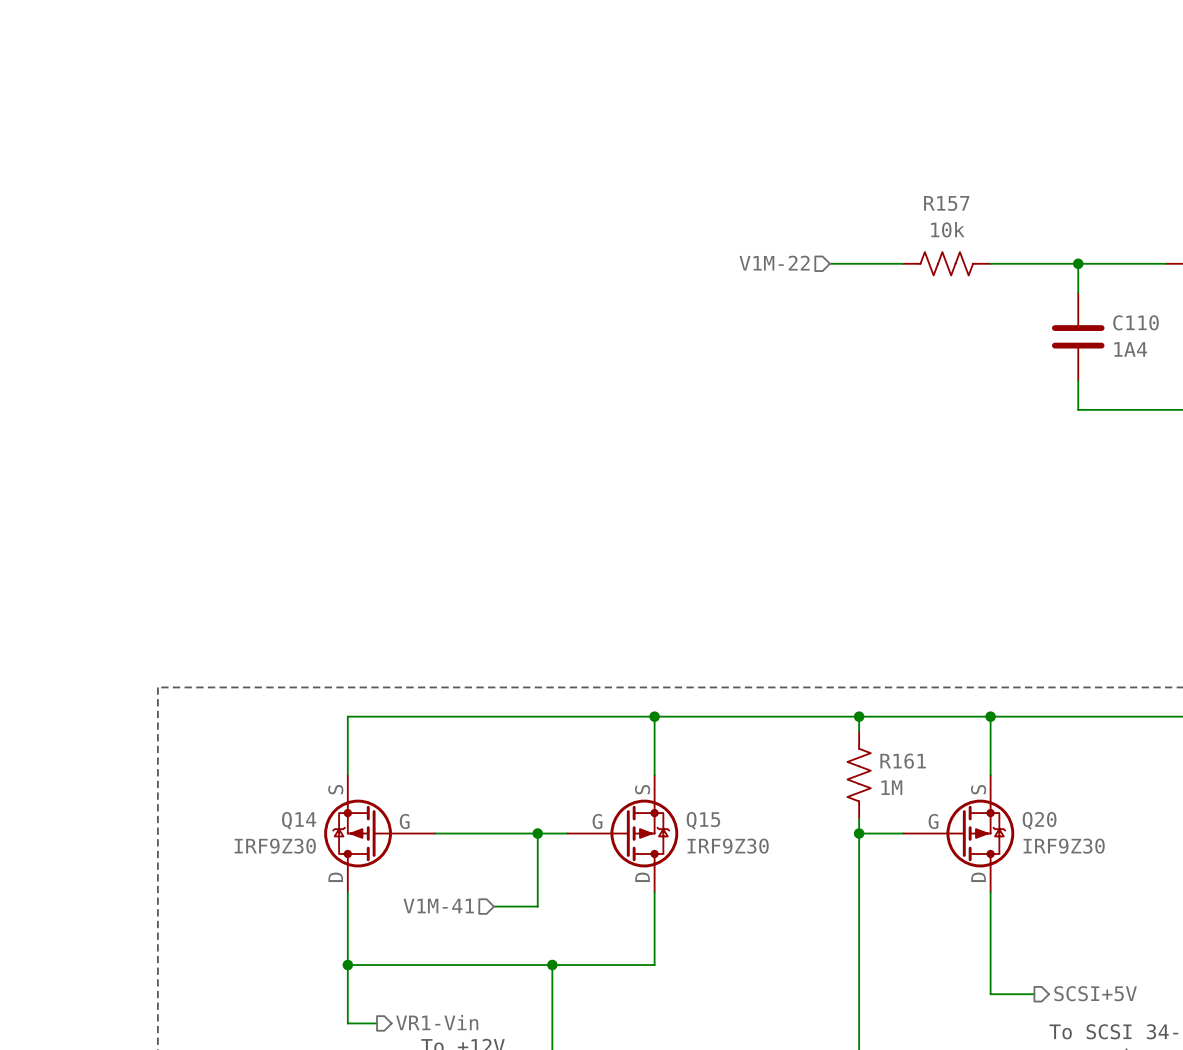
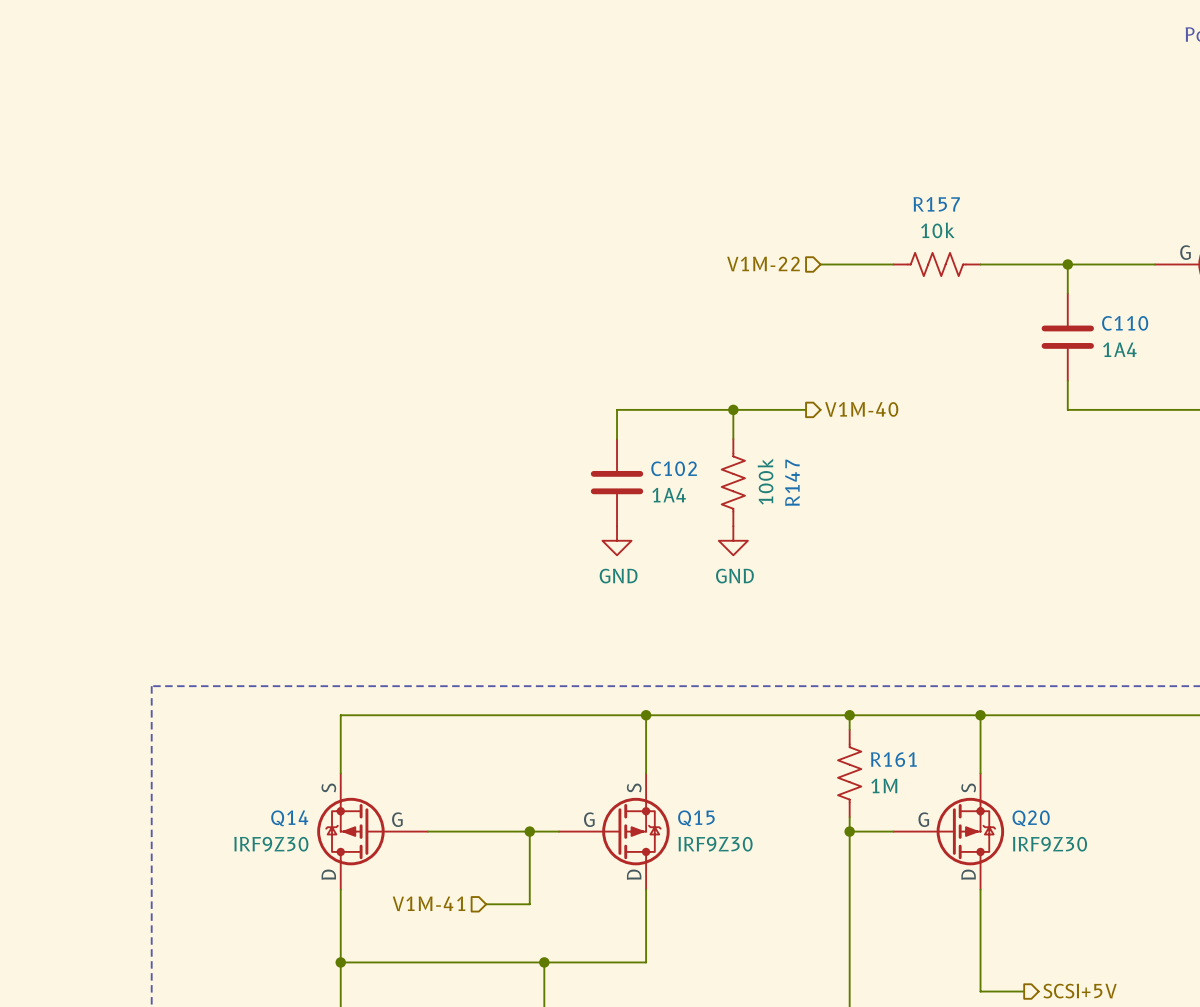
wire: none -> (733, 409) (733, 438)
junction: none -> (733, 409)
wire: none -> (806, 409) (617, 409) (617, 438)
hierarchical label: none -> V1M-40 (861, 409)
C102: none -> 1A4 (617, 482)
R147: none -> 100k (733, 482)
power symbol: none -> GND (617, 540)
power symbol: none -> GND (733, 540)

